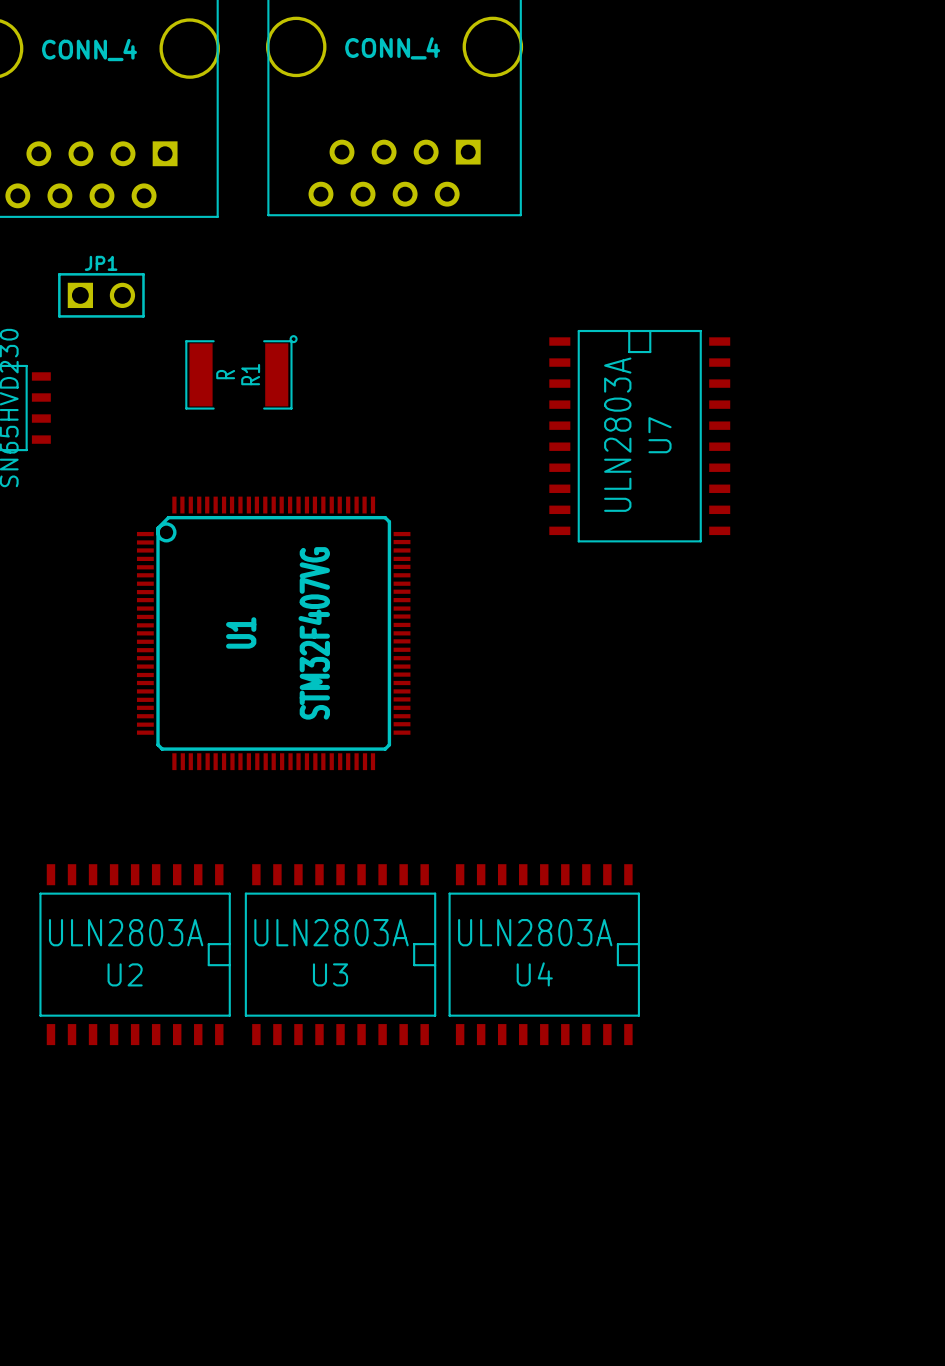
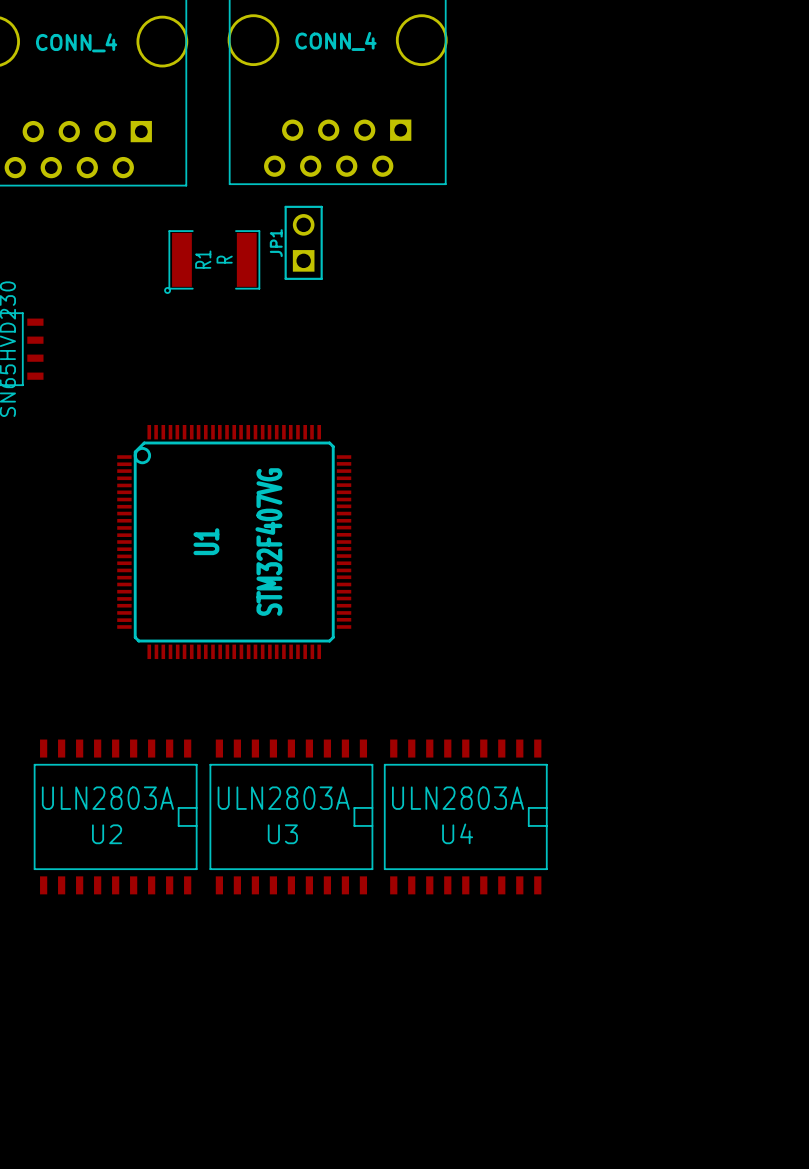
JP1 rotation: 0° (101, 295) -> 90° counterclockwise (303, 242)
JP1 position: (101, 295) -> (303, 242)
R1 rotation: 0° (241, 372) -> 180° (212, 262)
U7: ULN2803A (639, 436) -> none

